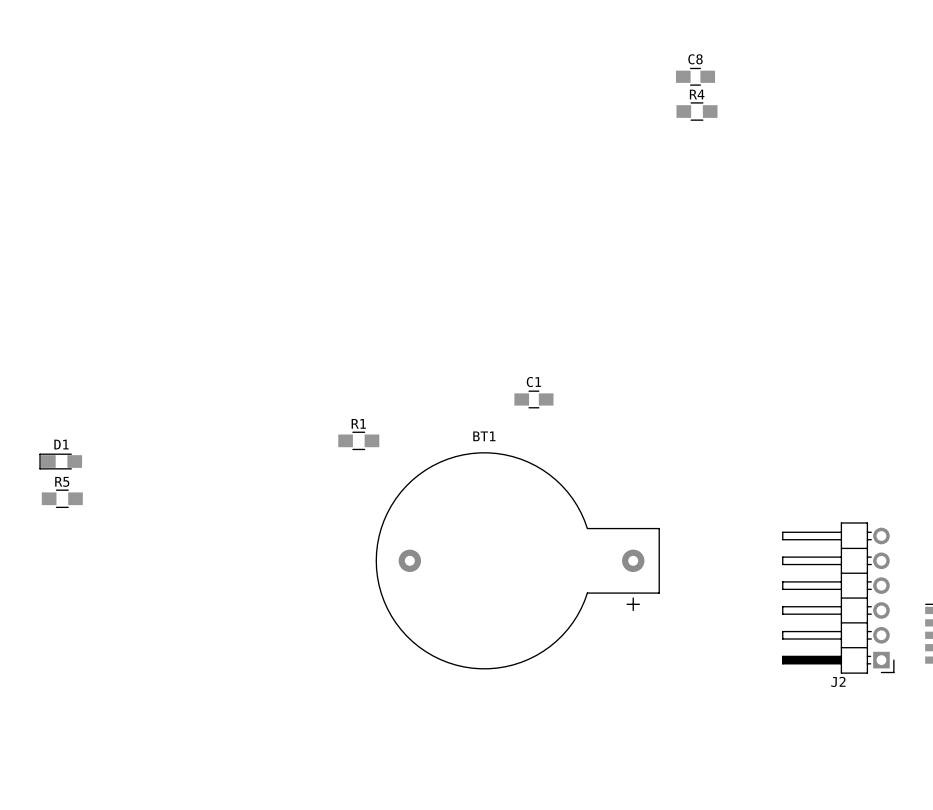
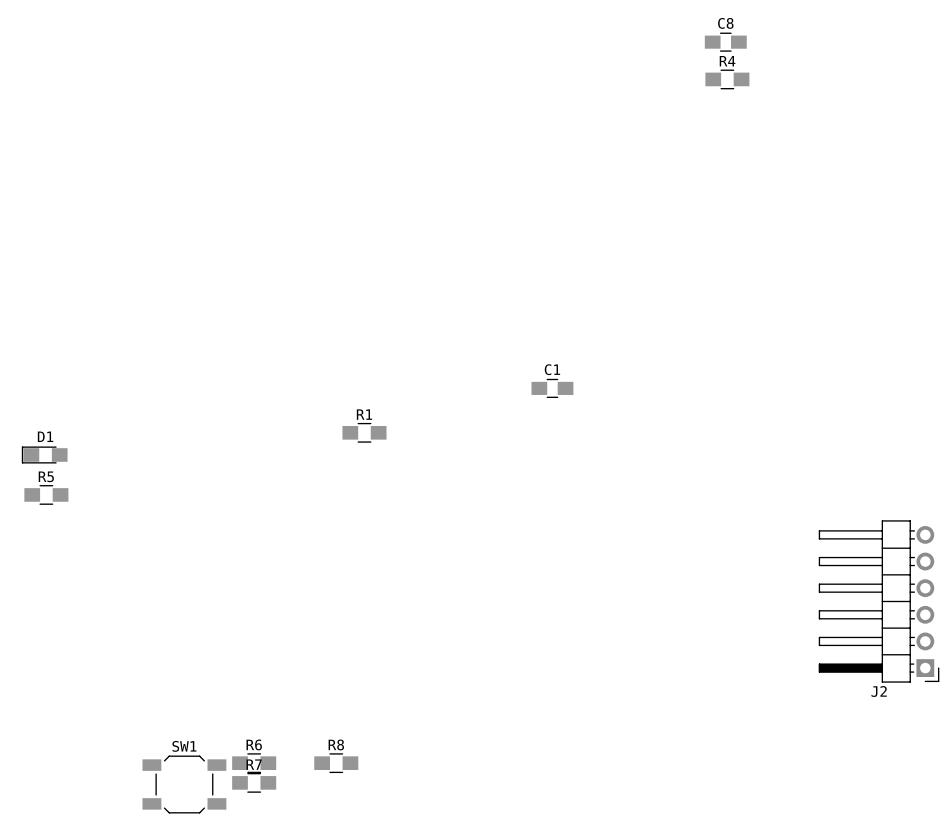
BT1: (517, 560) -> none
R6: none -> (254, 763)
R8: none -> (336, 763)
R7: none -> (254, 782)
SW1: none -> (184, 784)

